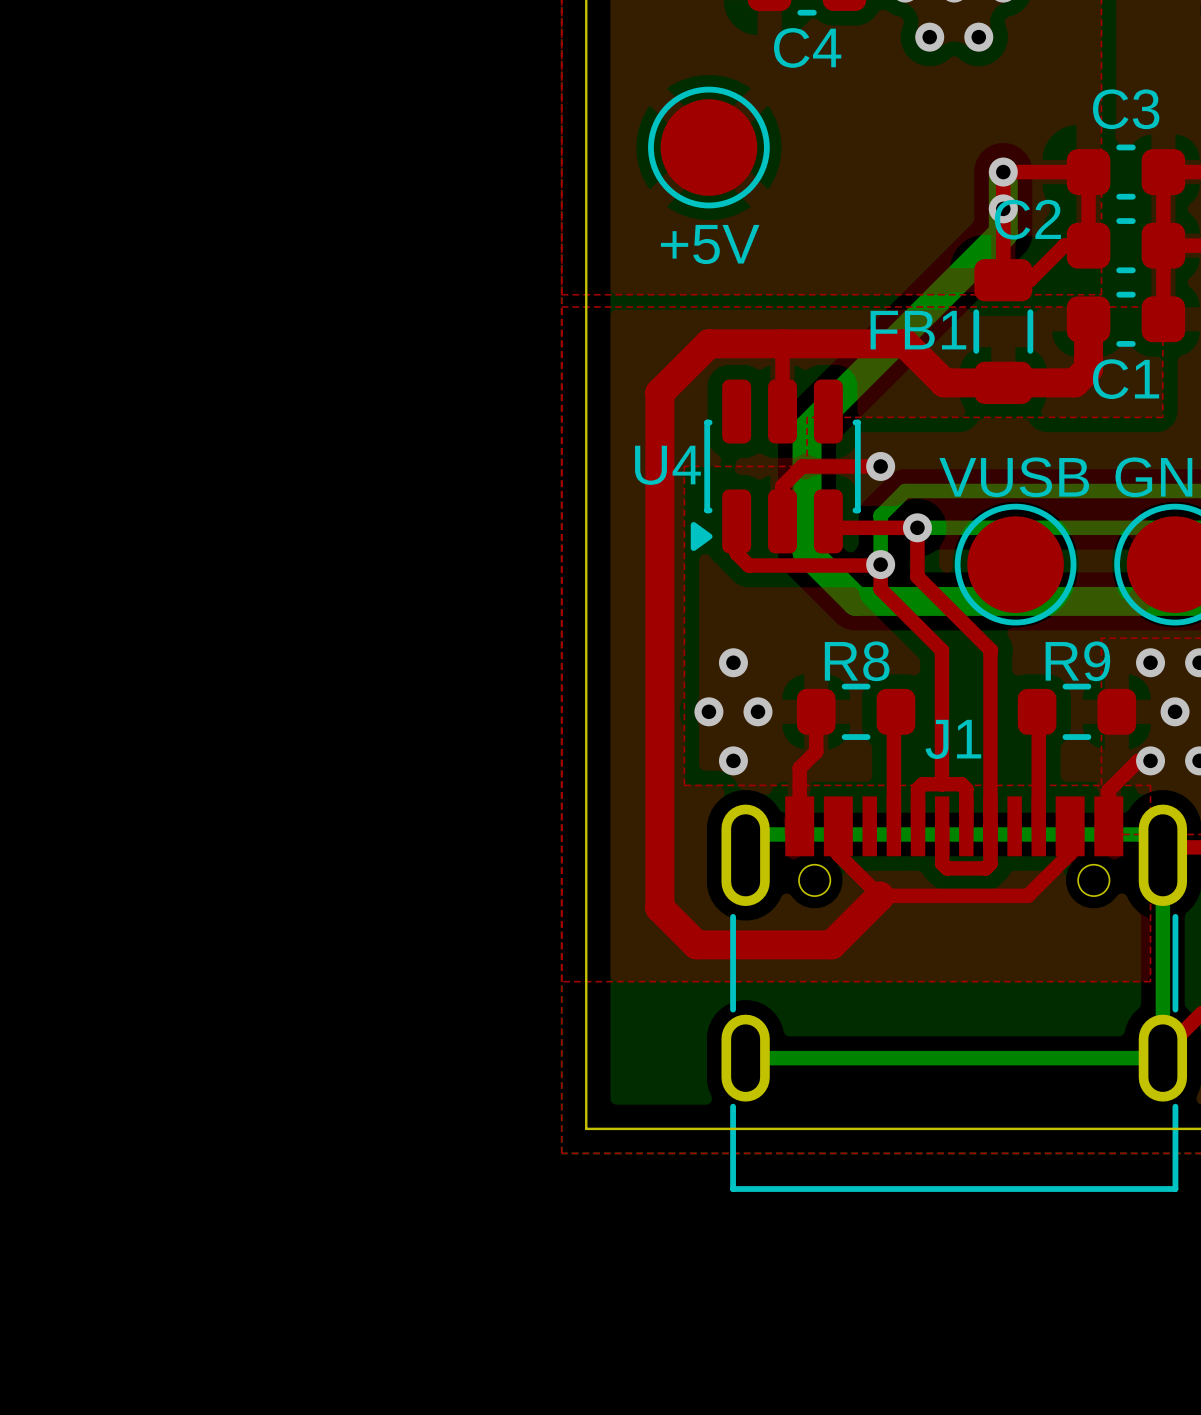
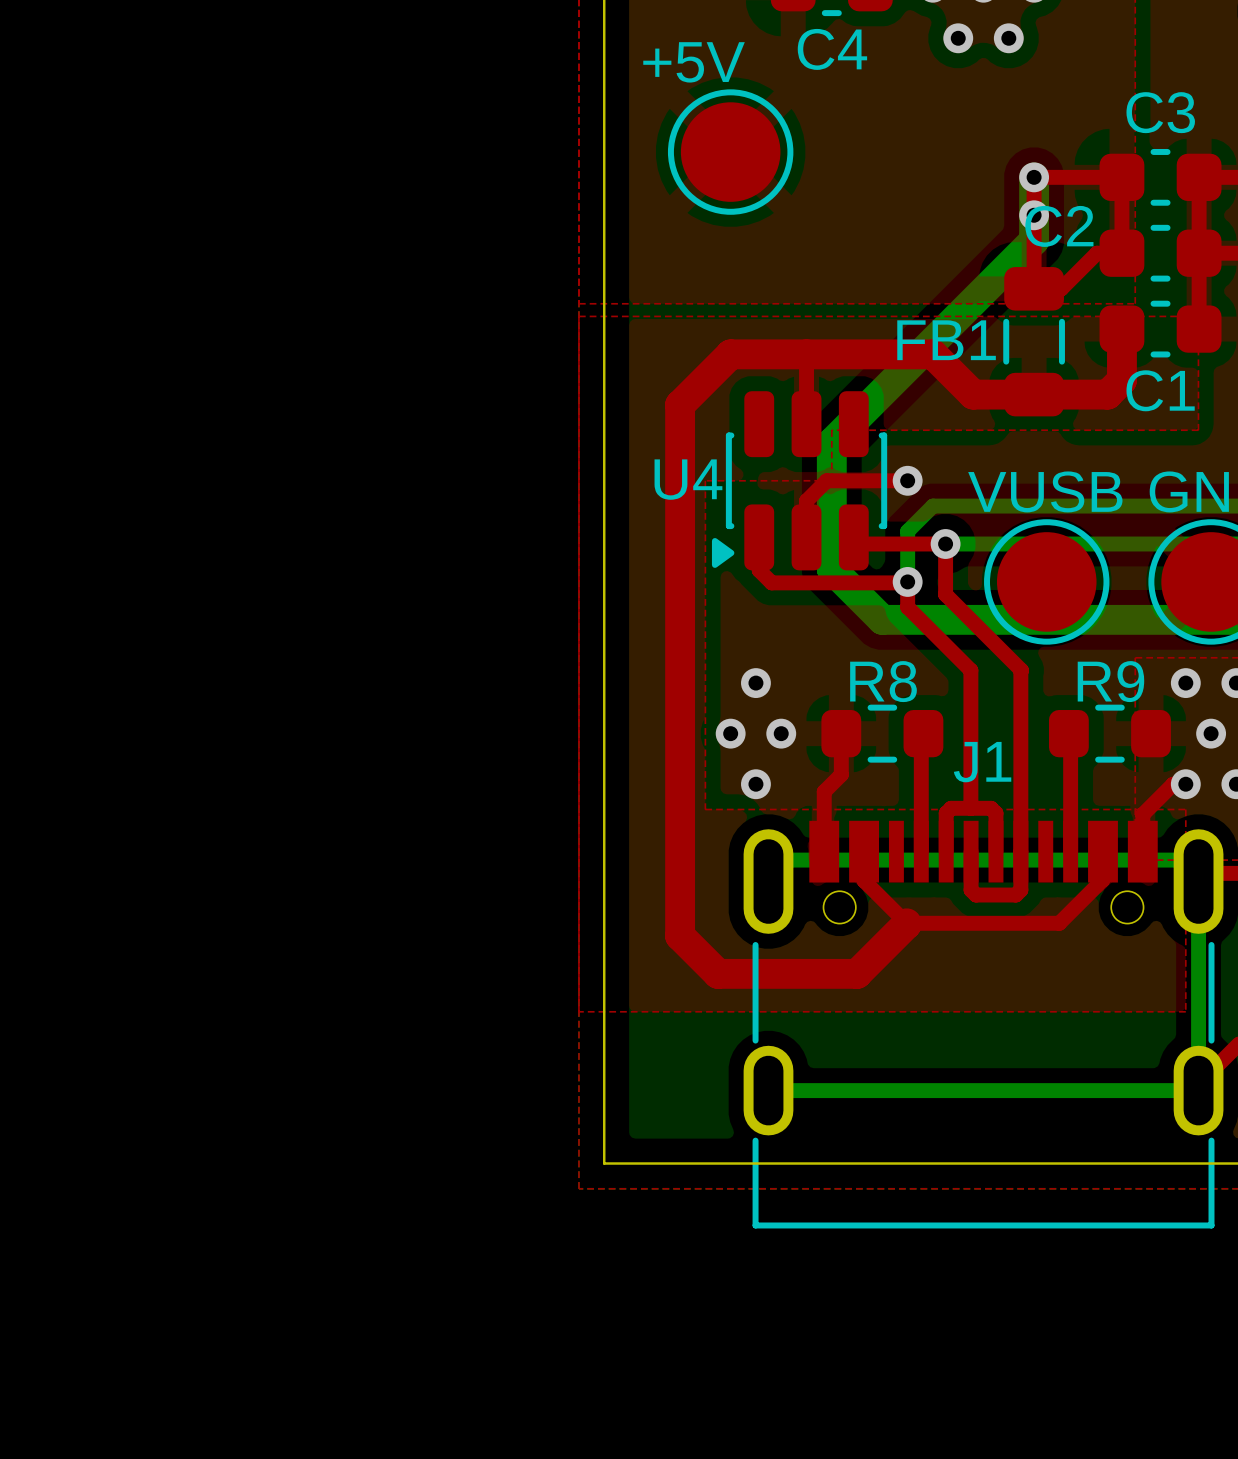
text position: +5V (710, 244) -> +5V (694, 62)

